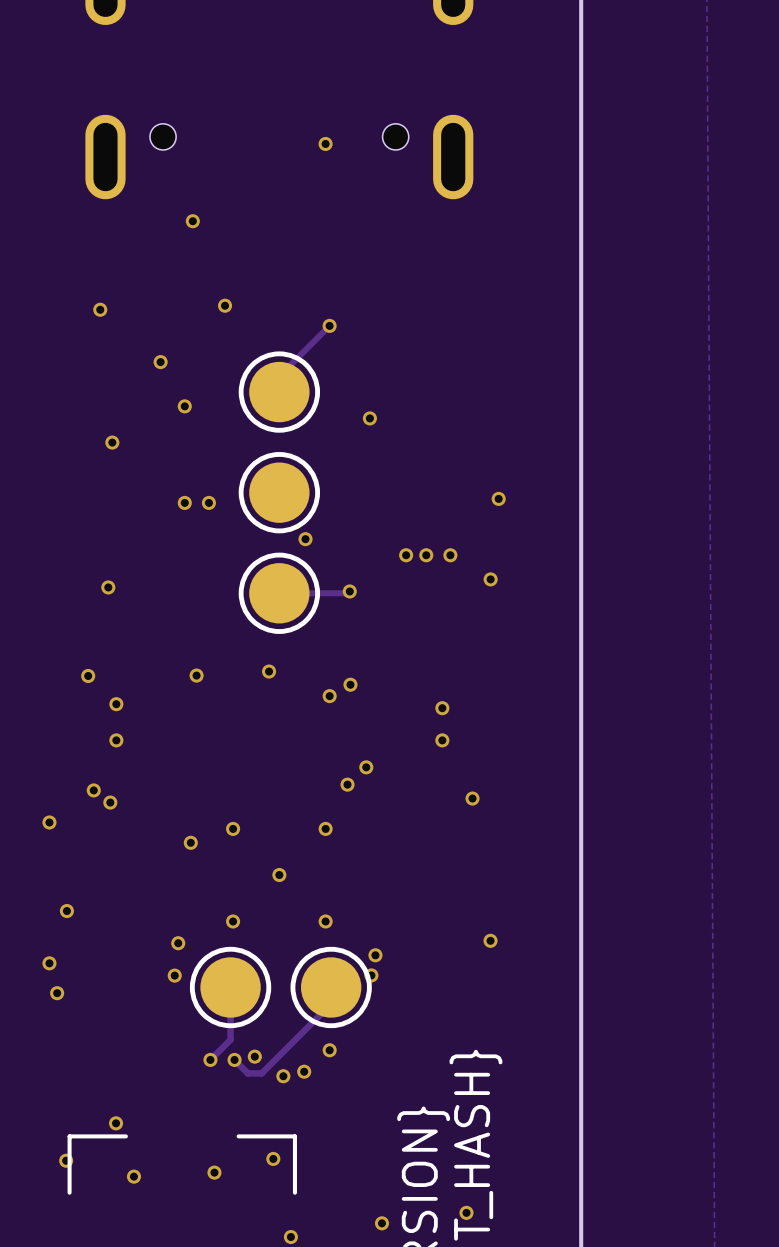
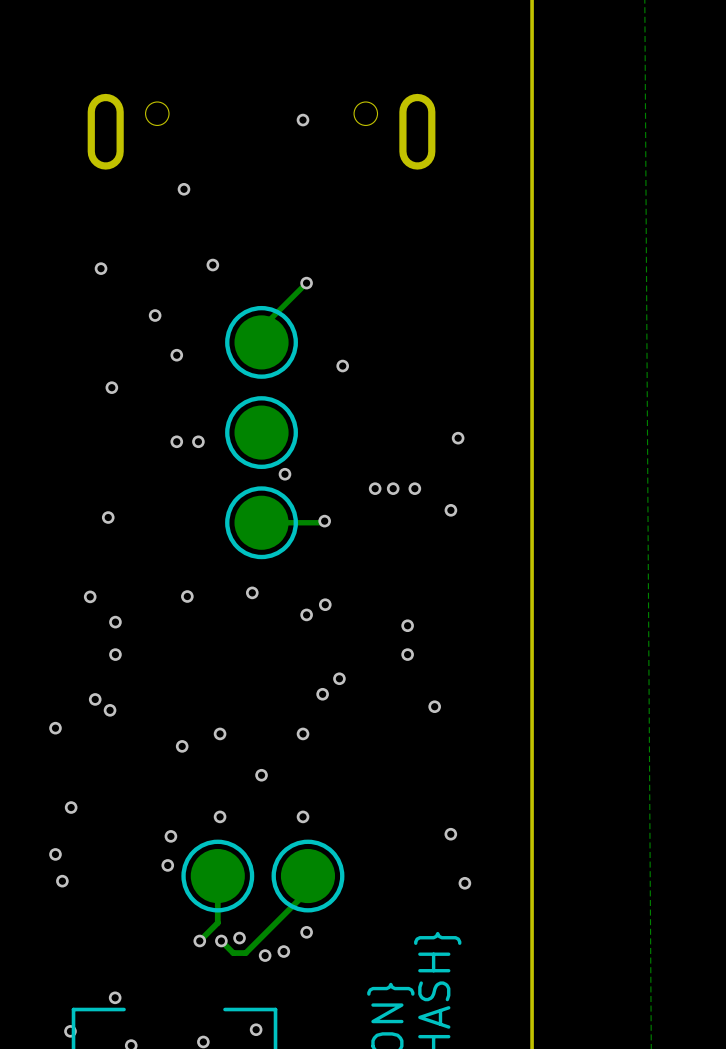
via: (375, 955) -> none
via: (371, 975) -> none
via: none -> (464, 883)

